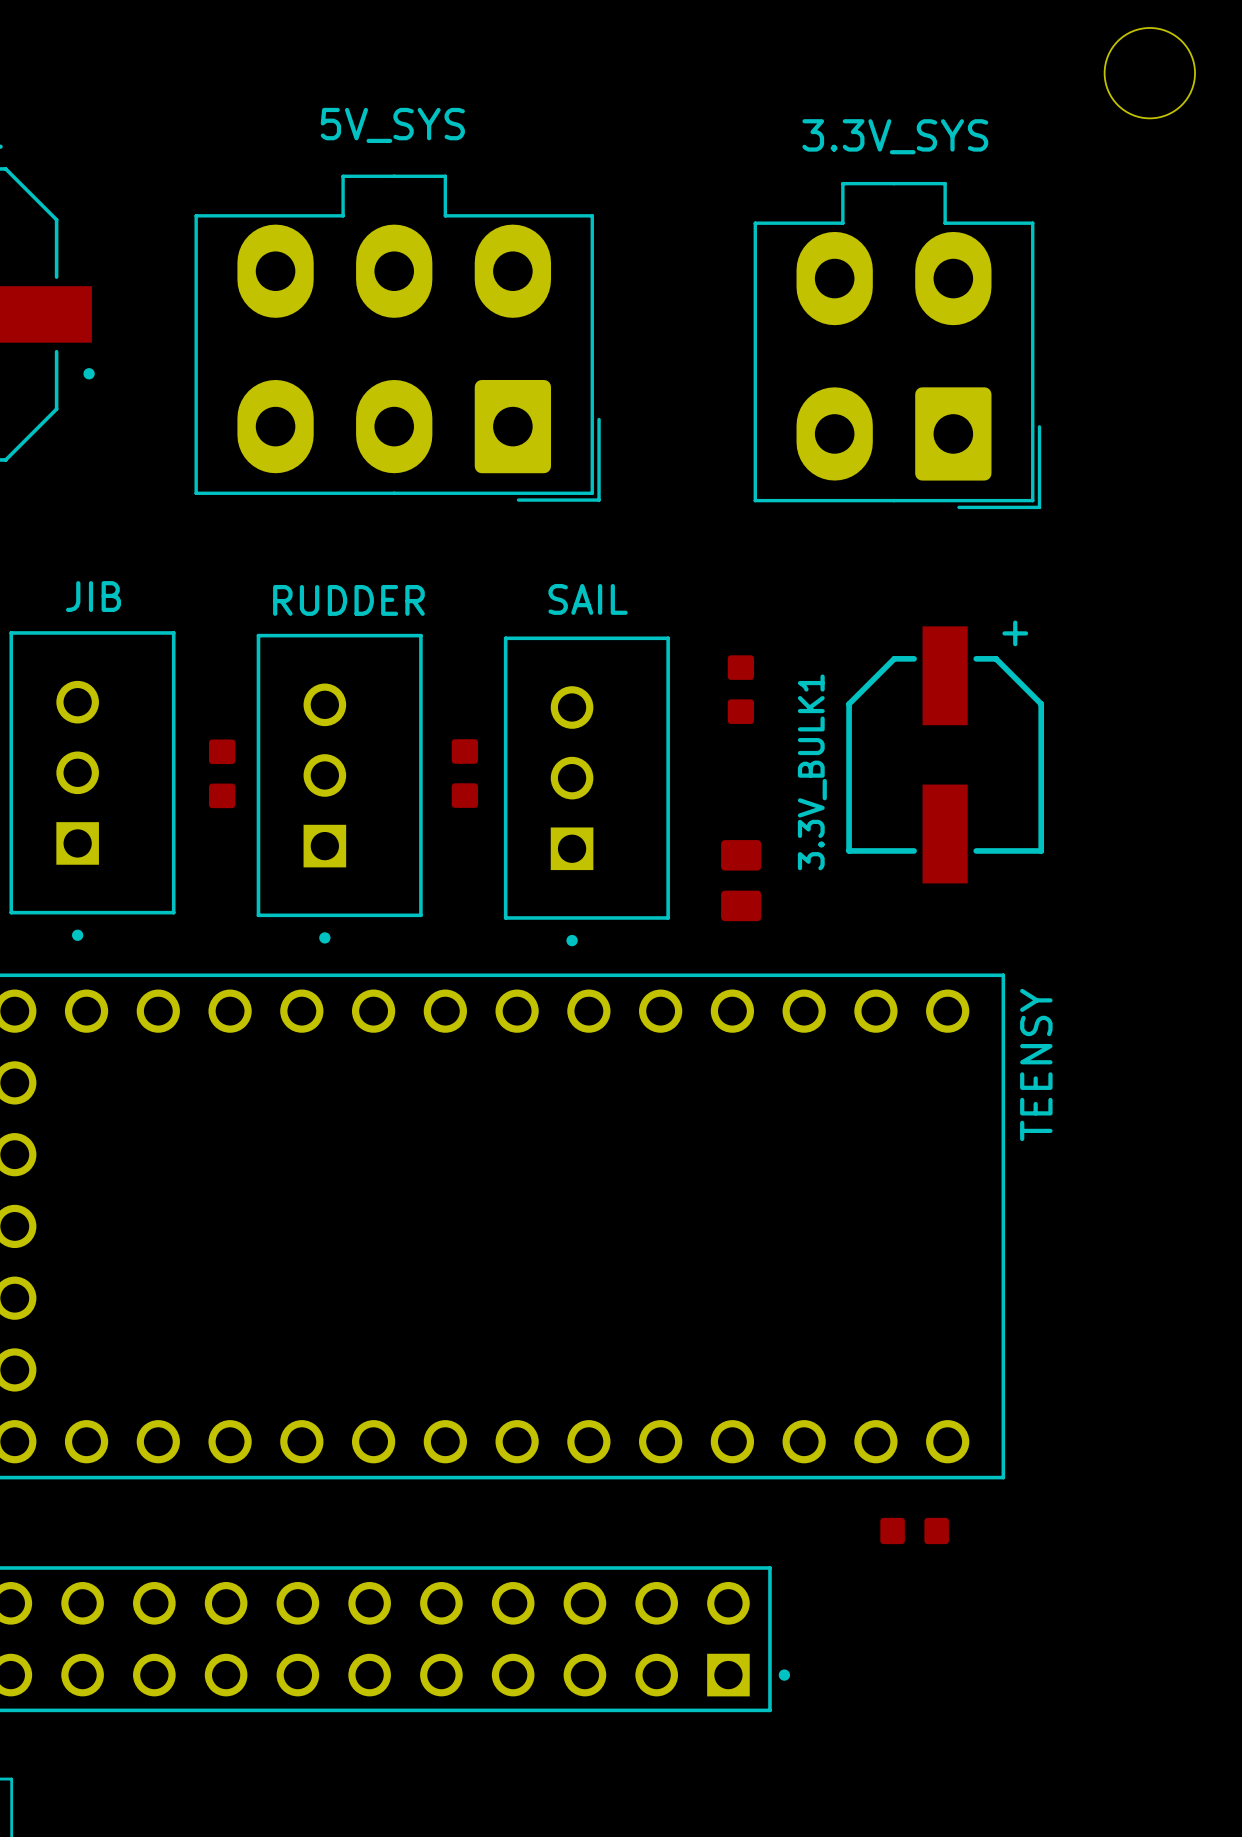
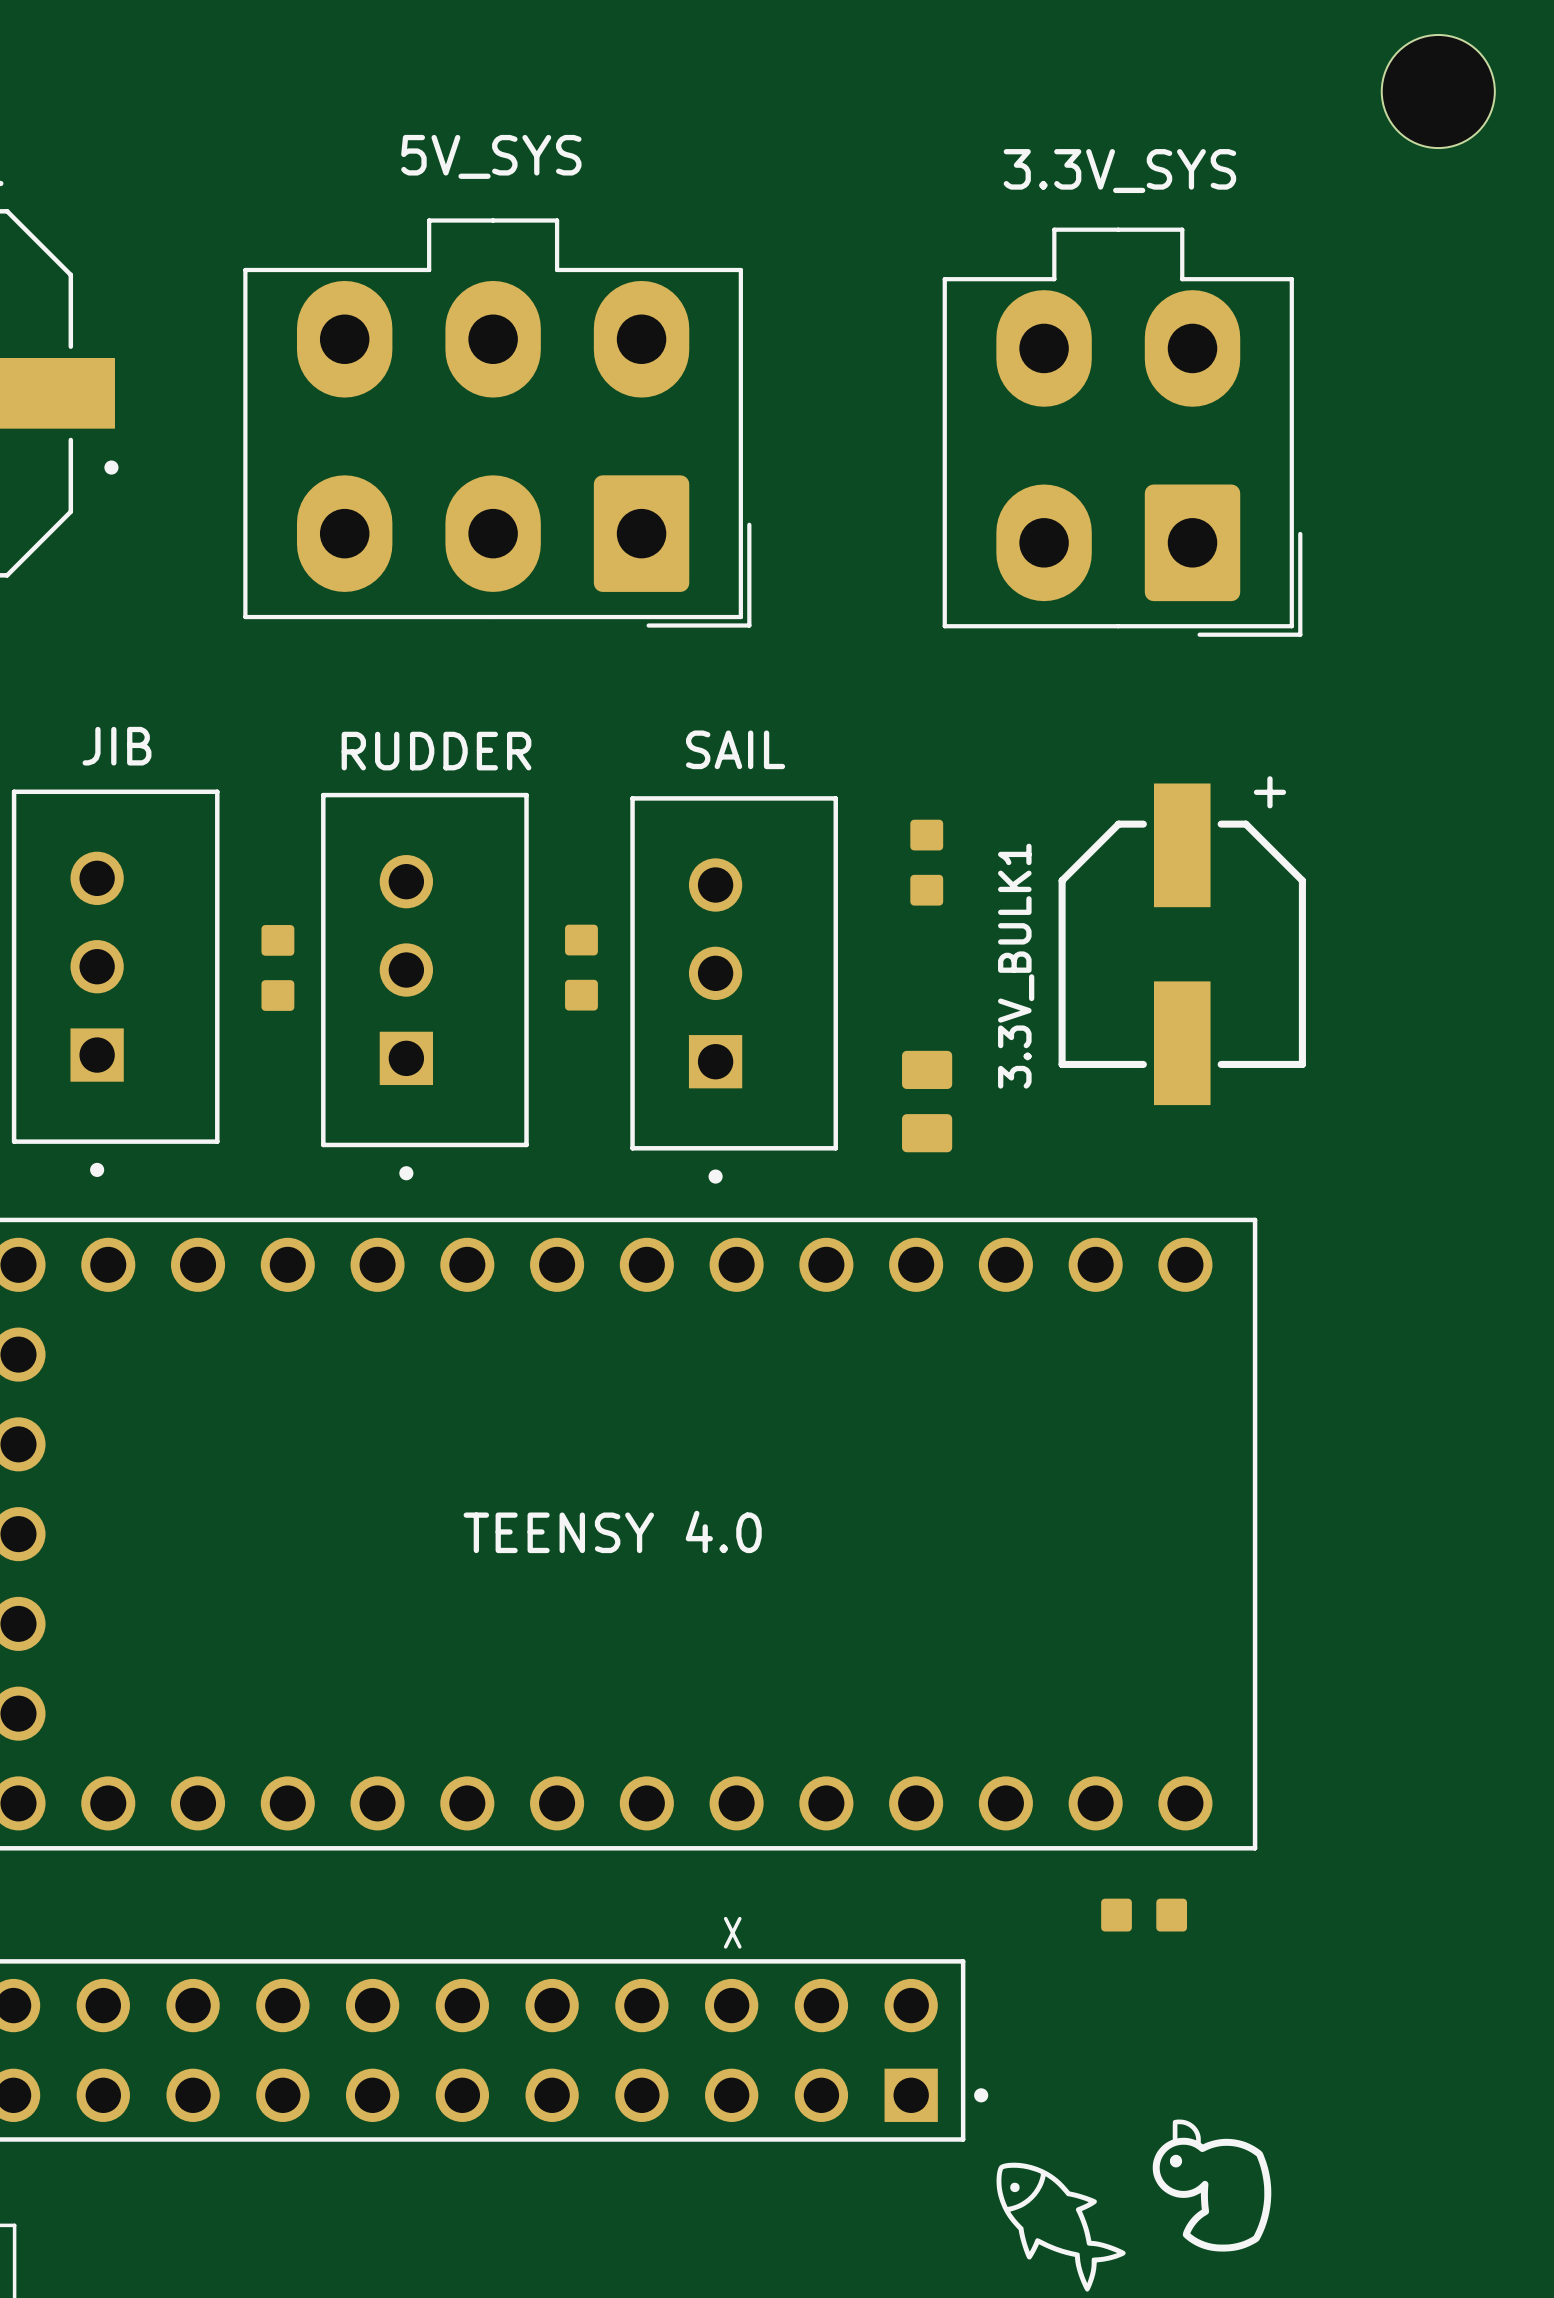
TEENSY name: TEENSY (1036, 1064) -> TEENSY 4.0 (612, 1531)
text: none -> X (732, 1932)
drawing: none -> [996, 2119, 1272, 2292]

